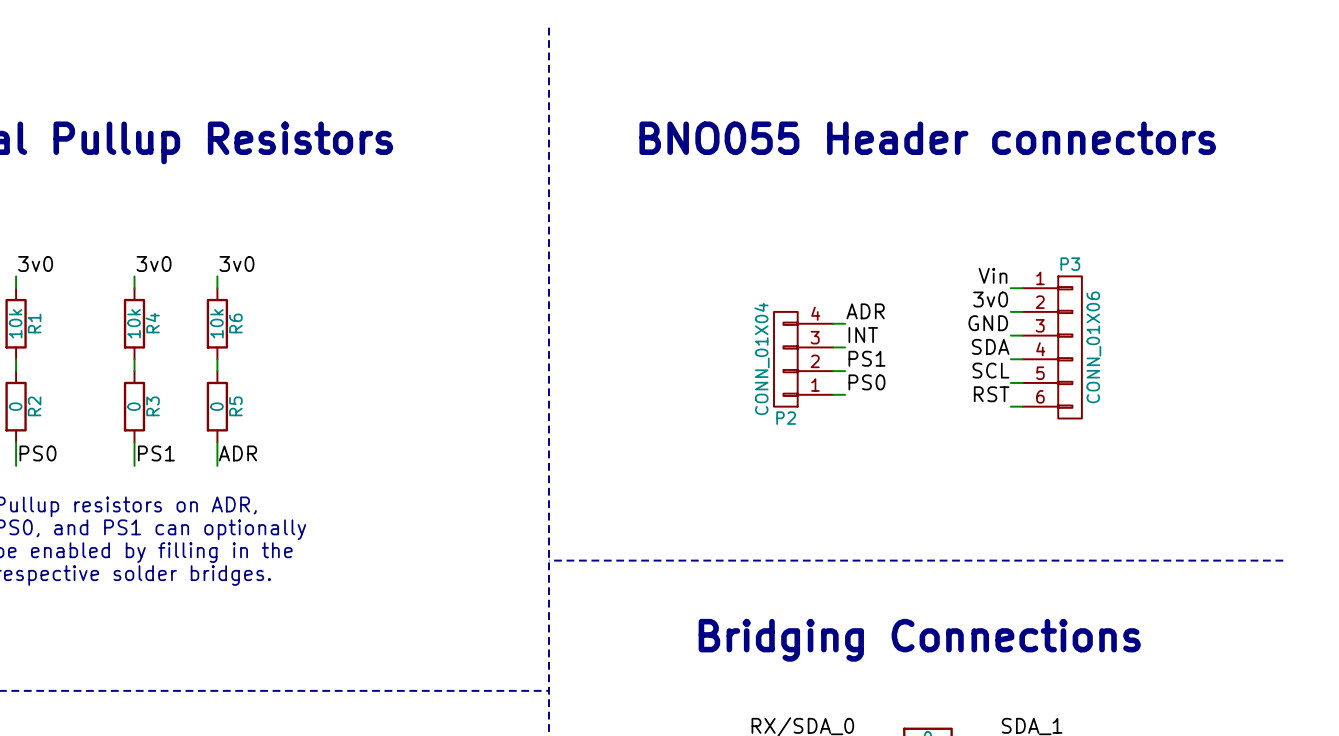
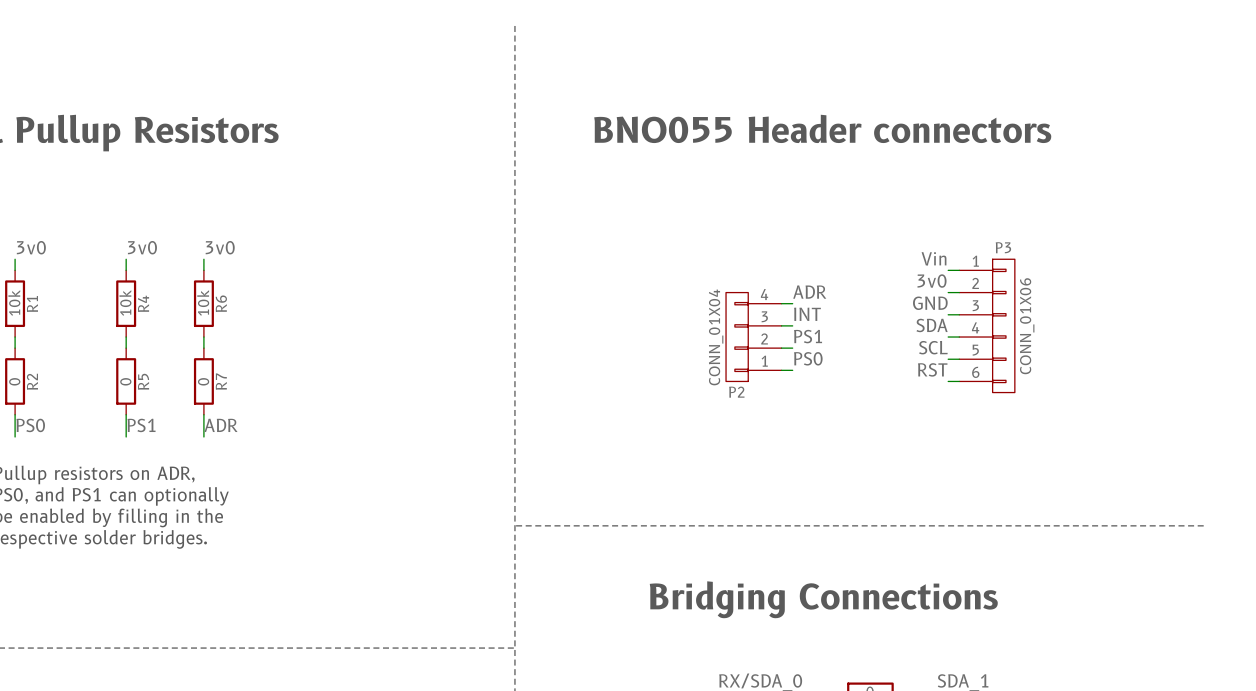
R3 name: R3 (153, 406) -> R5 (143, 381)
R5 name: R5 (235, 406) -> R7 (221, 381)

